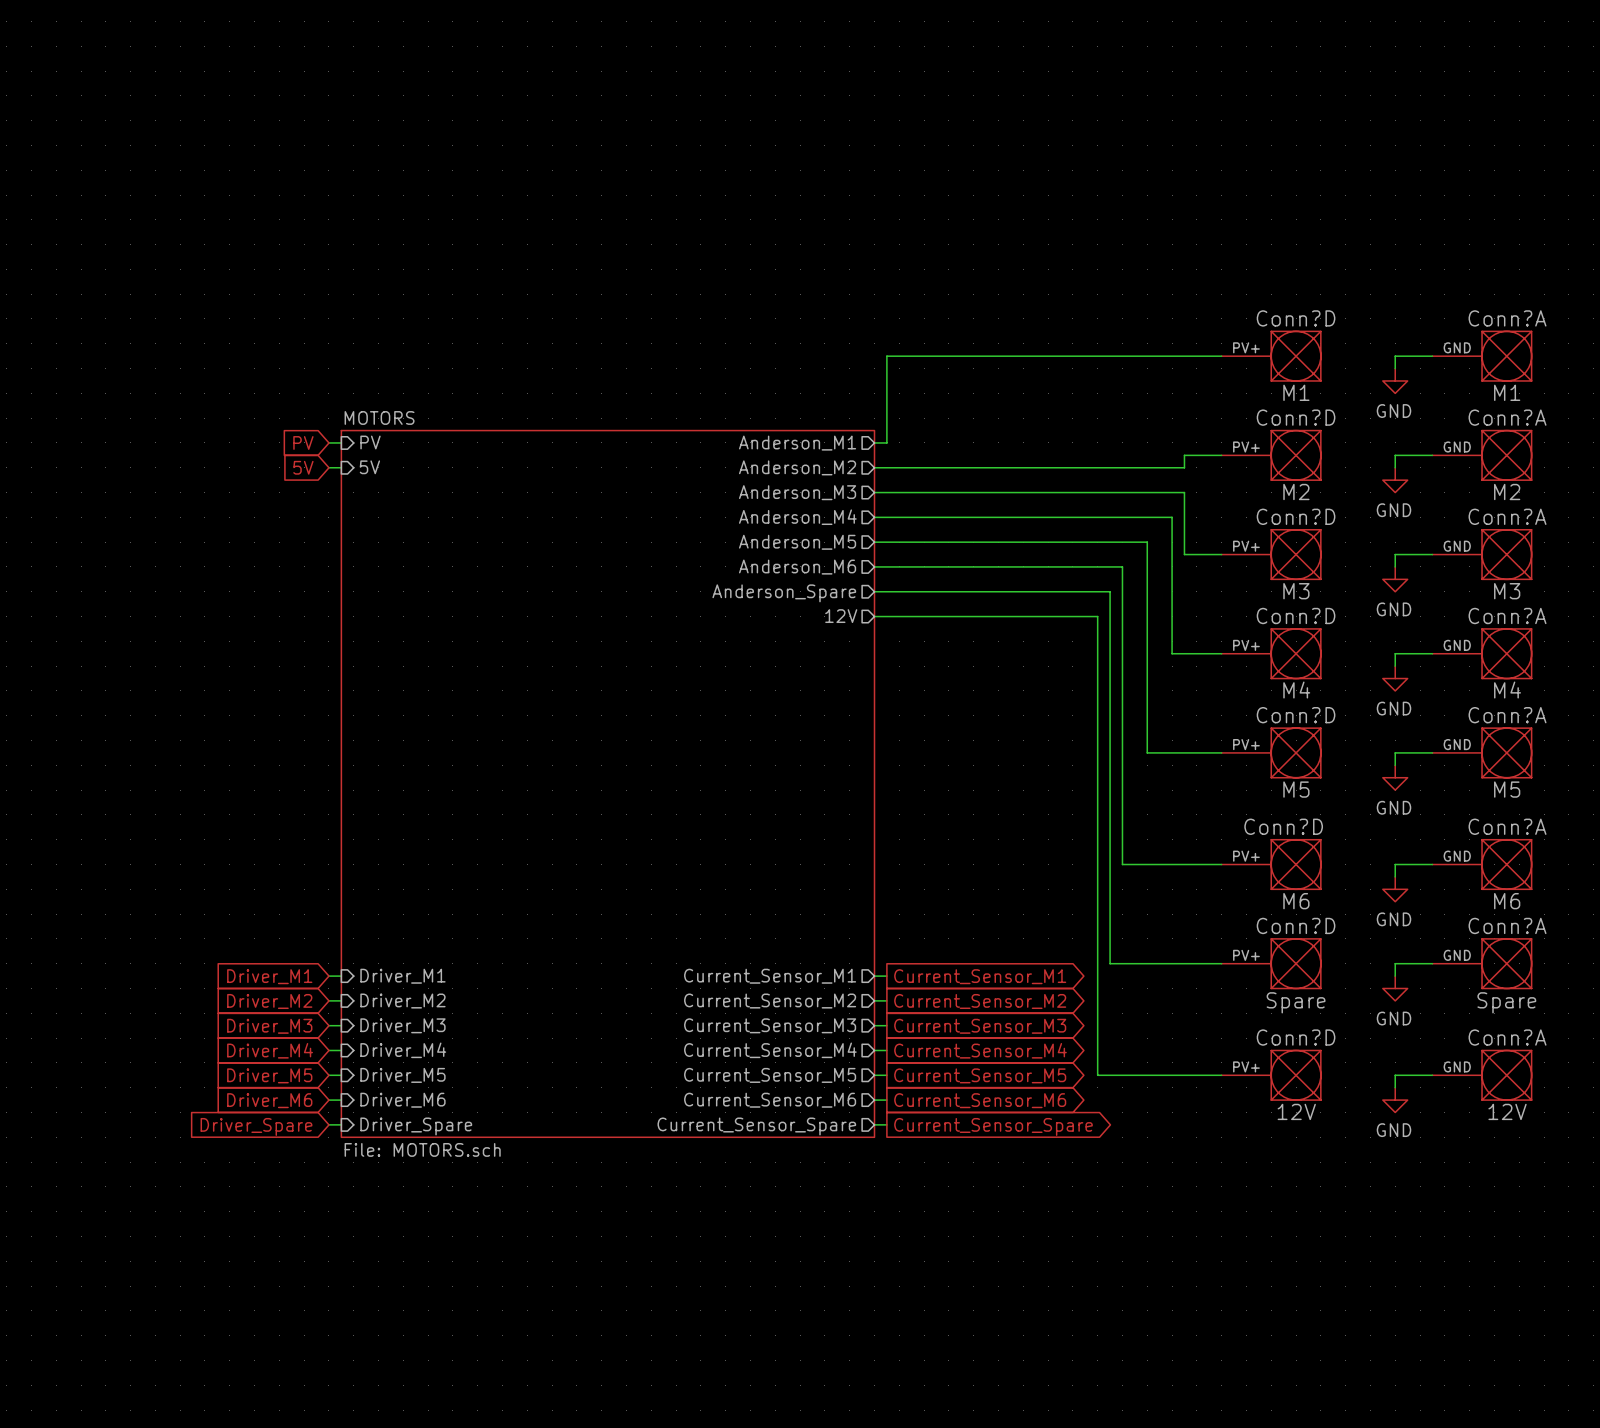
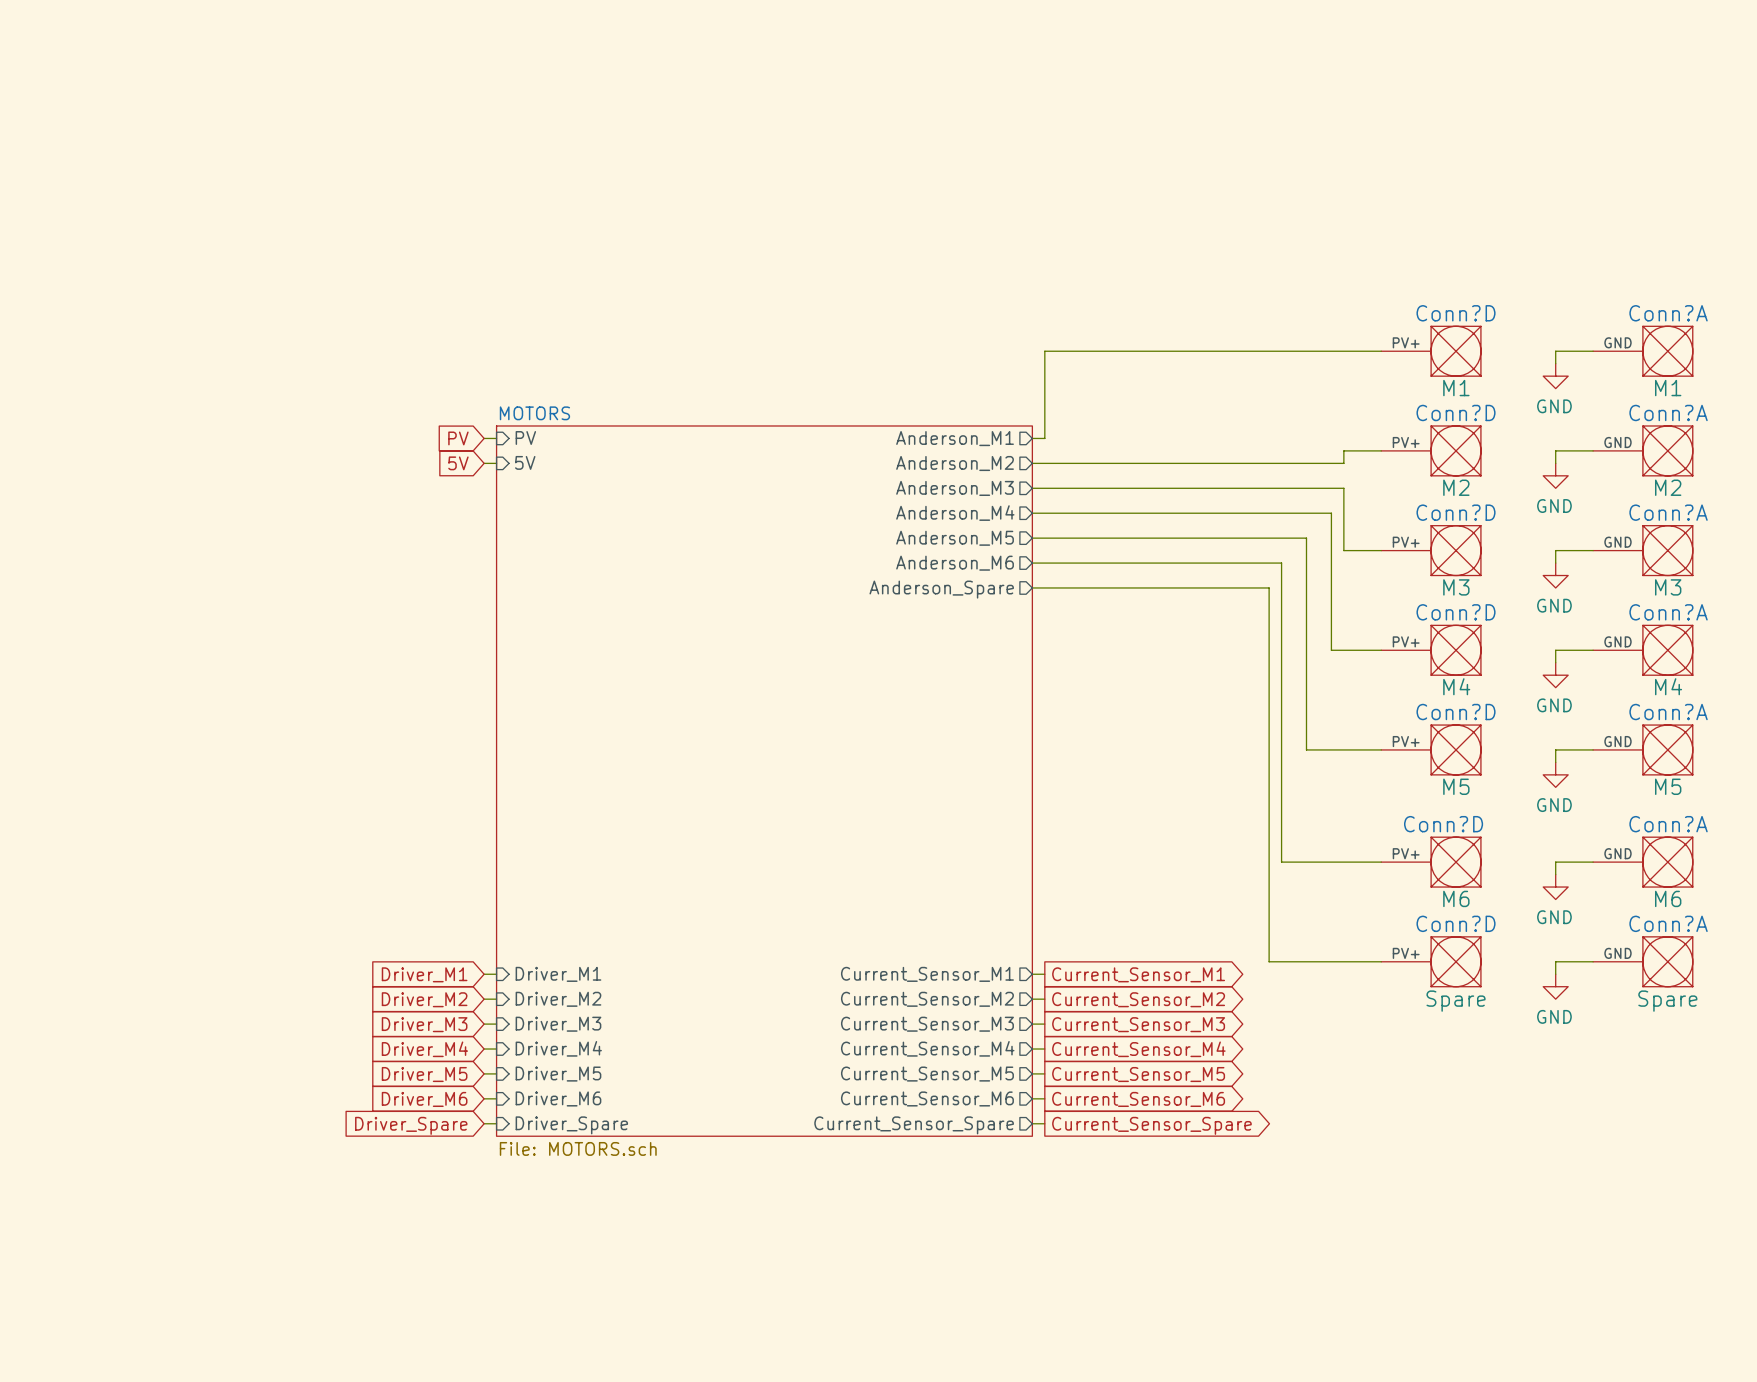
sheet pin: 12V (841, 616) -> none
wire: (874, 616) (1097, 616) (1097, 1075) (1221, 1075) -> none
Conn?D: 12V (1271, 1075) -> none
wire: (1432, 1075) (1395, 1075) (1395, 1087) -> none
Conn?A: 12V (1482, 1075) -> none
power symbol: GND (1395, 1100) -> none

